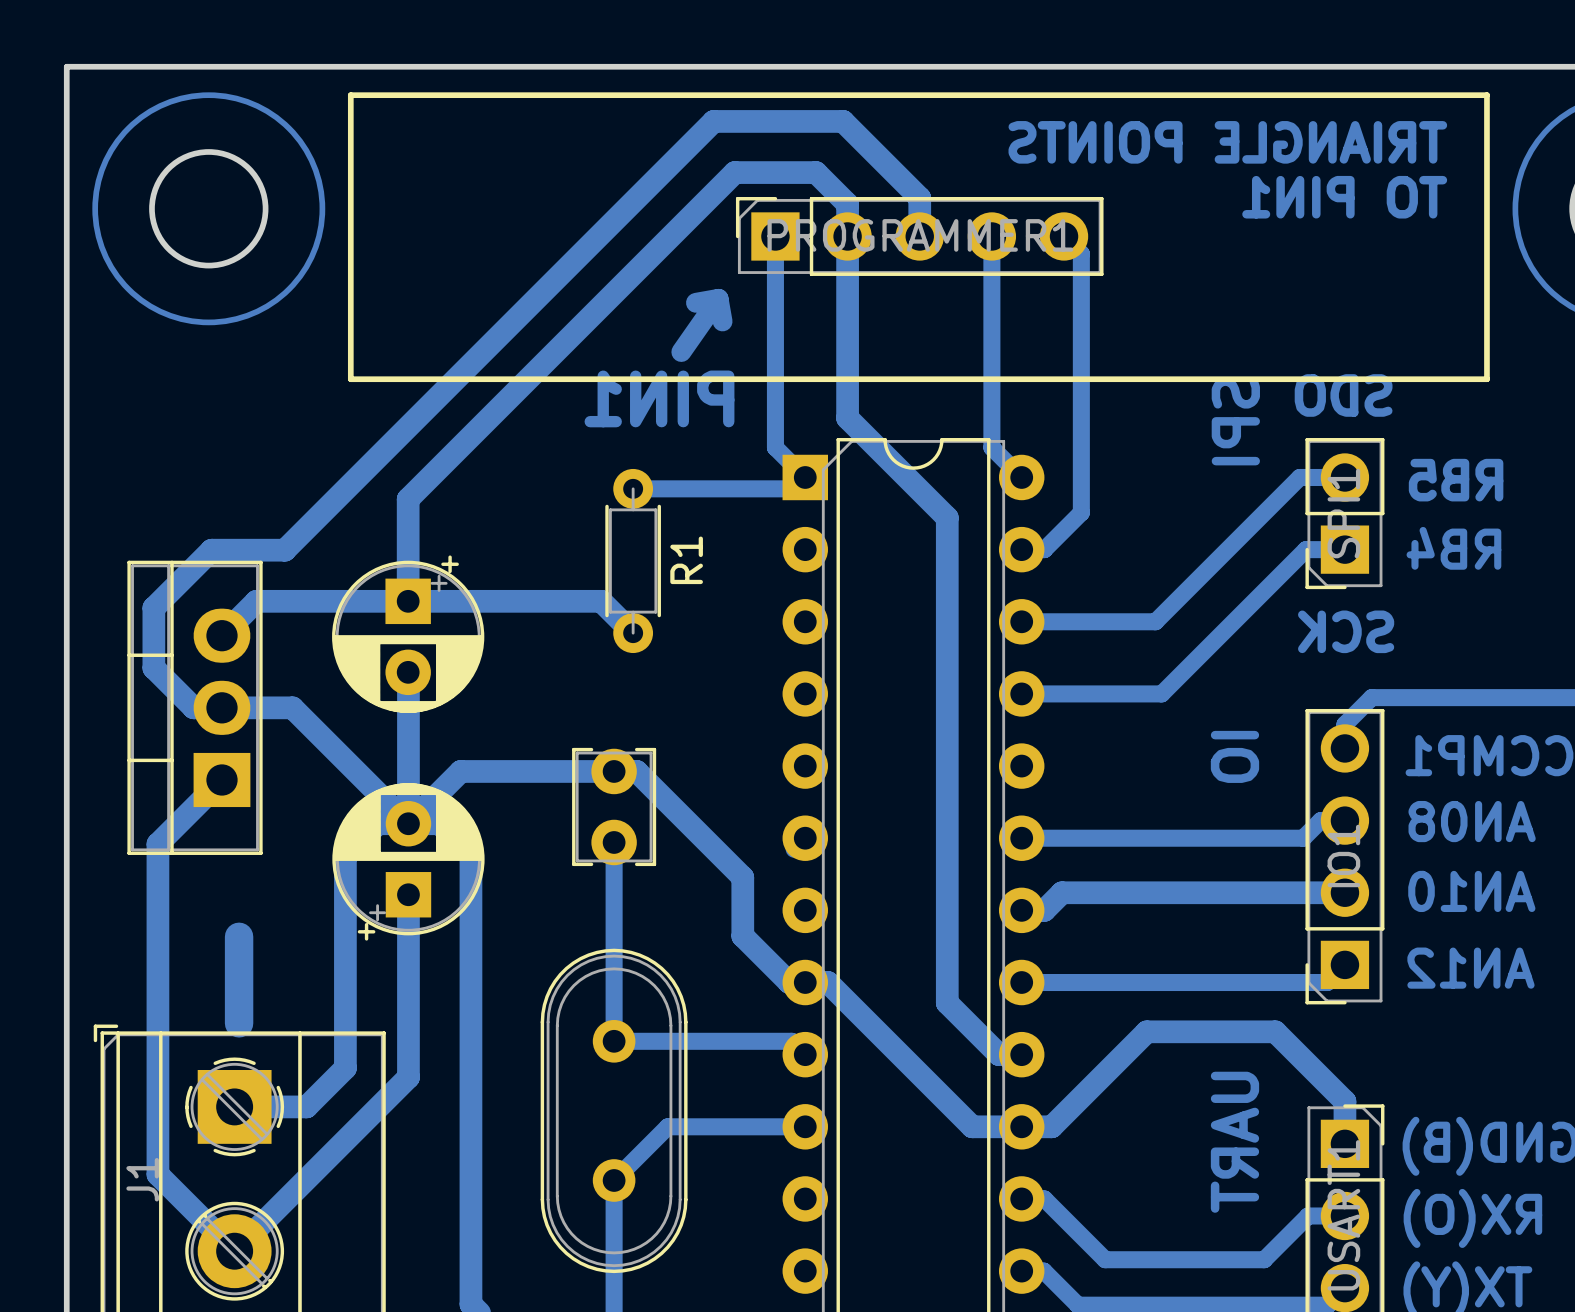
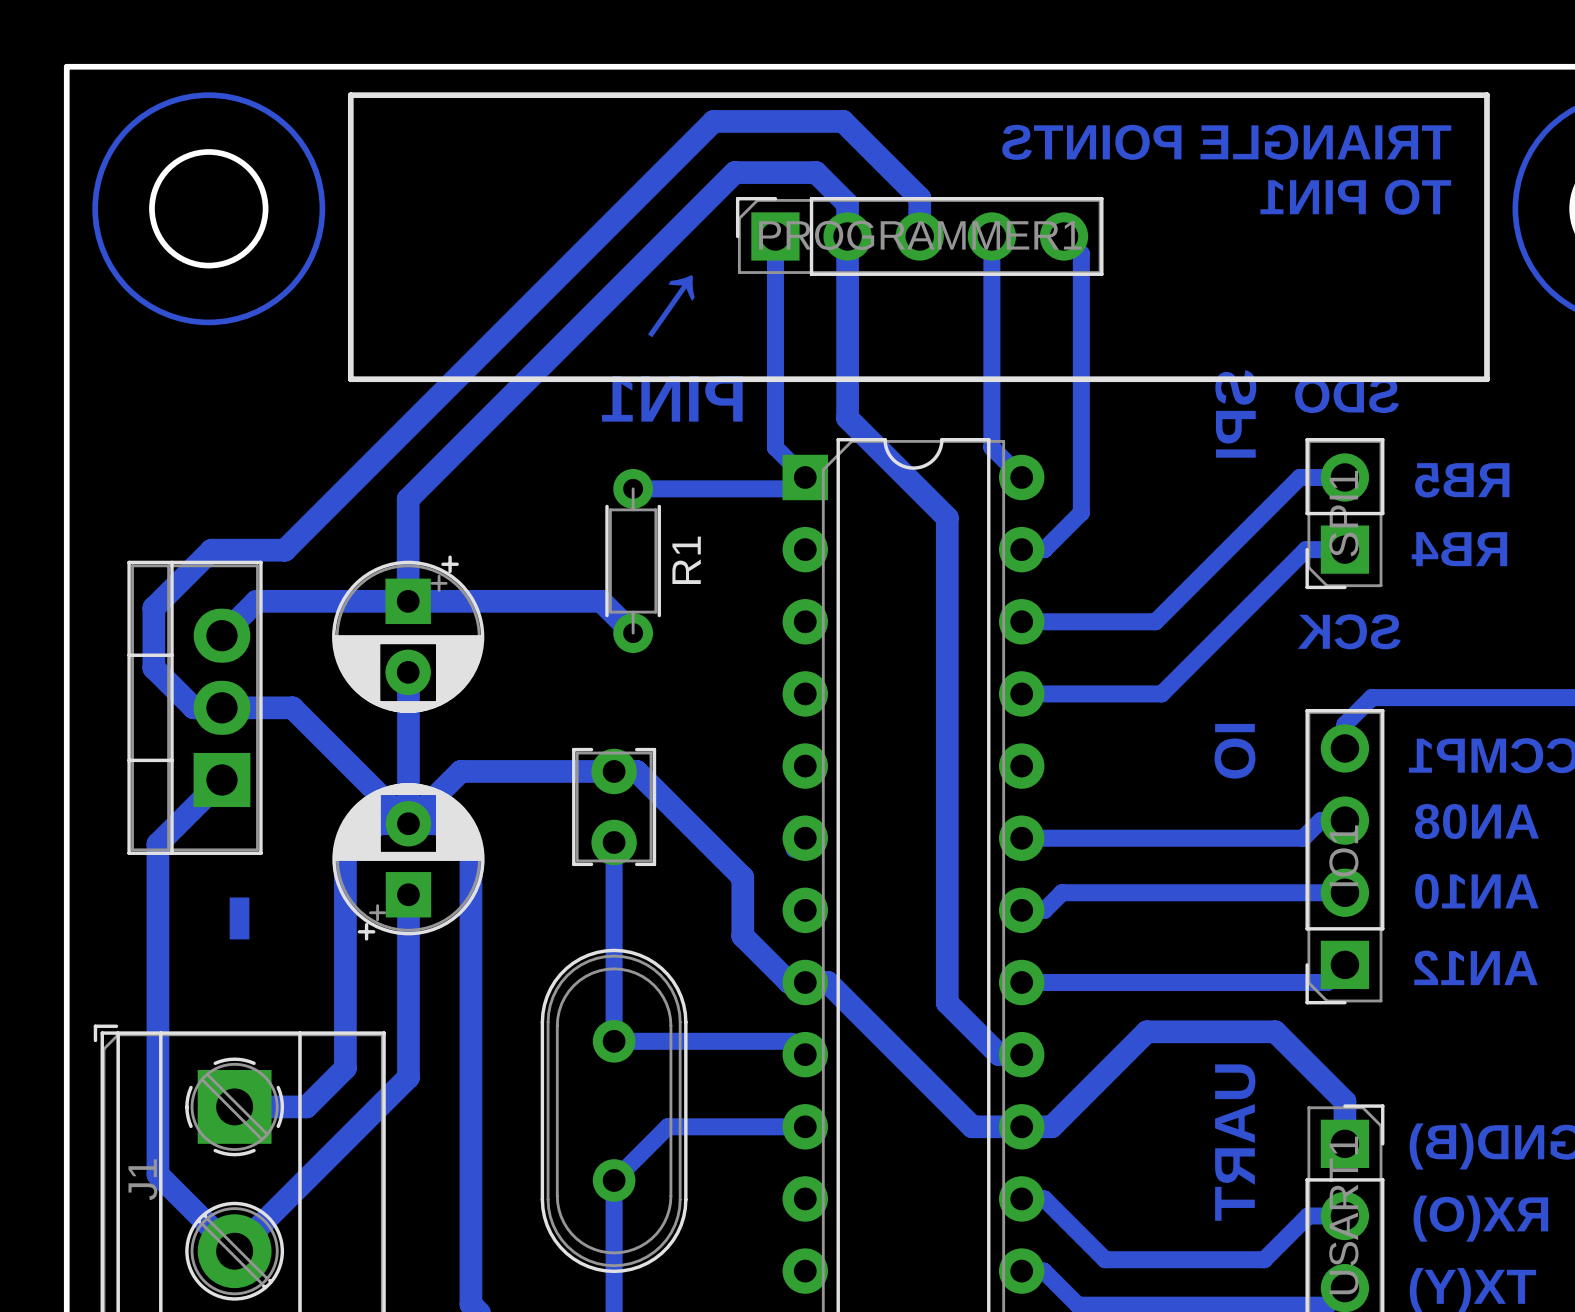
bottom track width: thick (1344, 892) (1062, 892) (1044, 910) (1021, 910) (1028, 903) -> thin (1344, 892) (1062, 892) (1044, 910) (1021, 910) (1028, 903)

